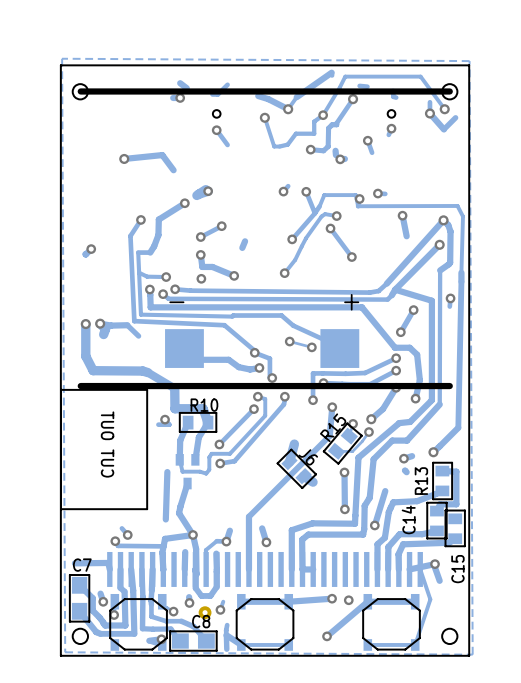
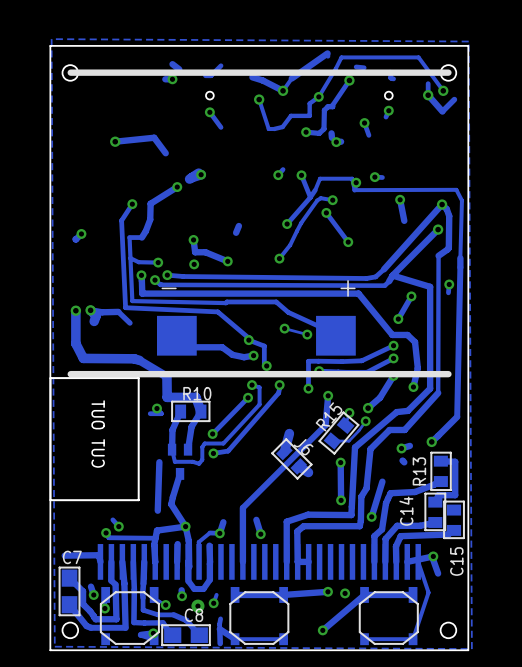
track: (221, 226) (200, 237) -> none
via: (221, 226) -> none
via: (200, 237) -> none

